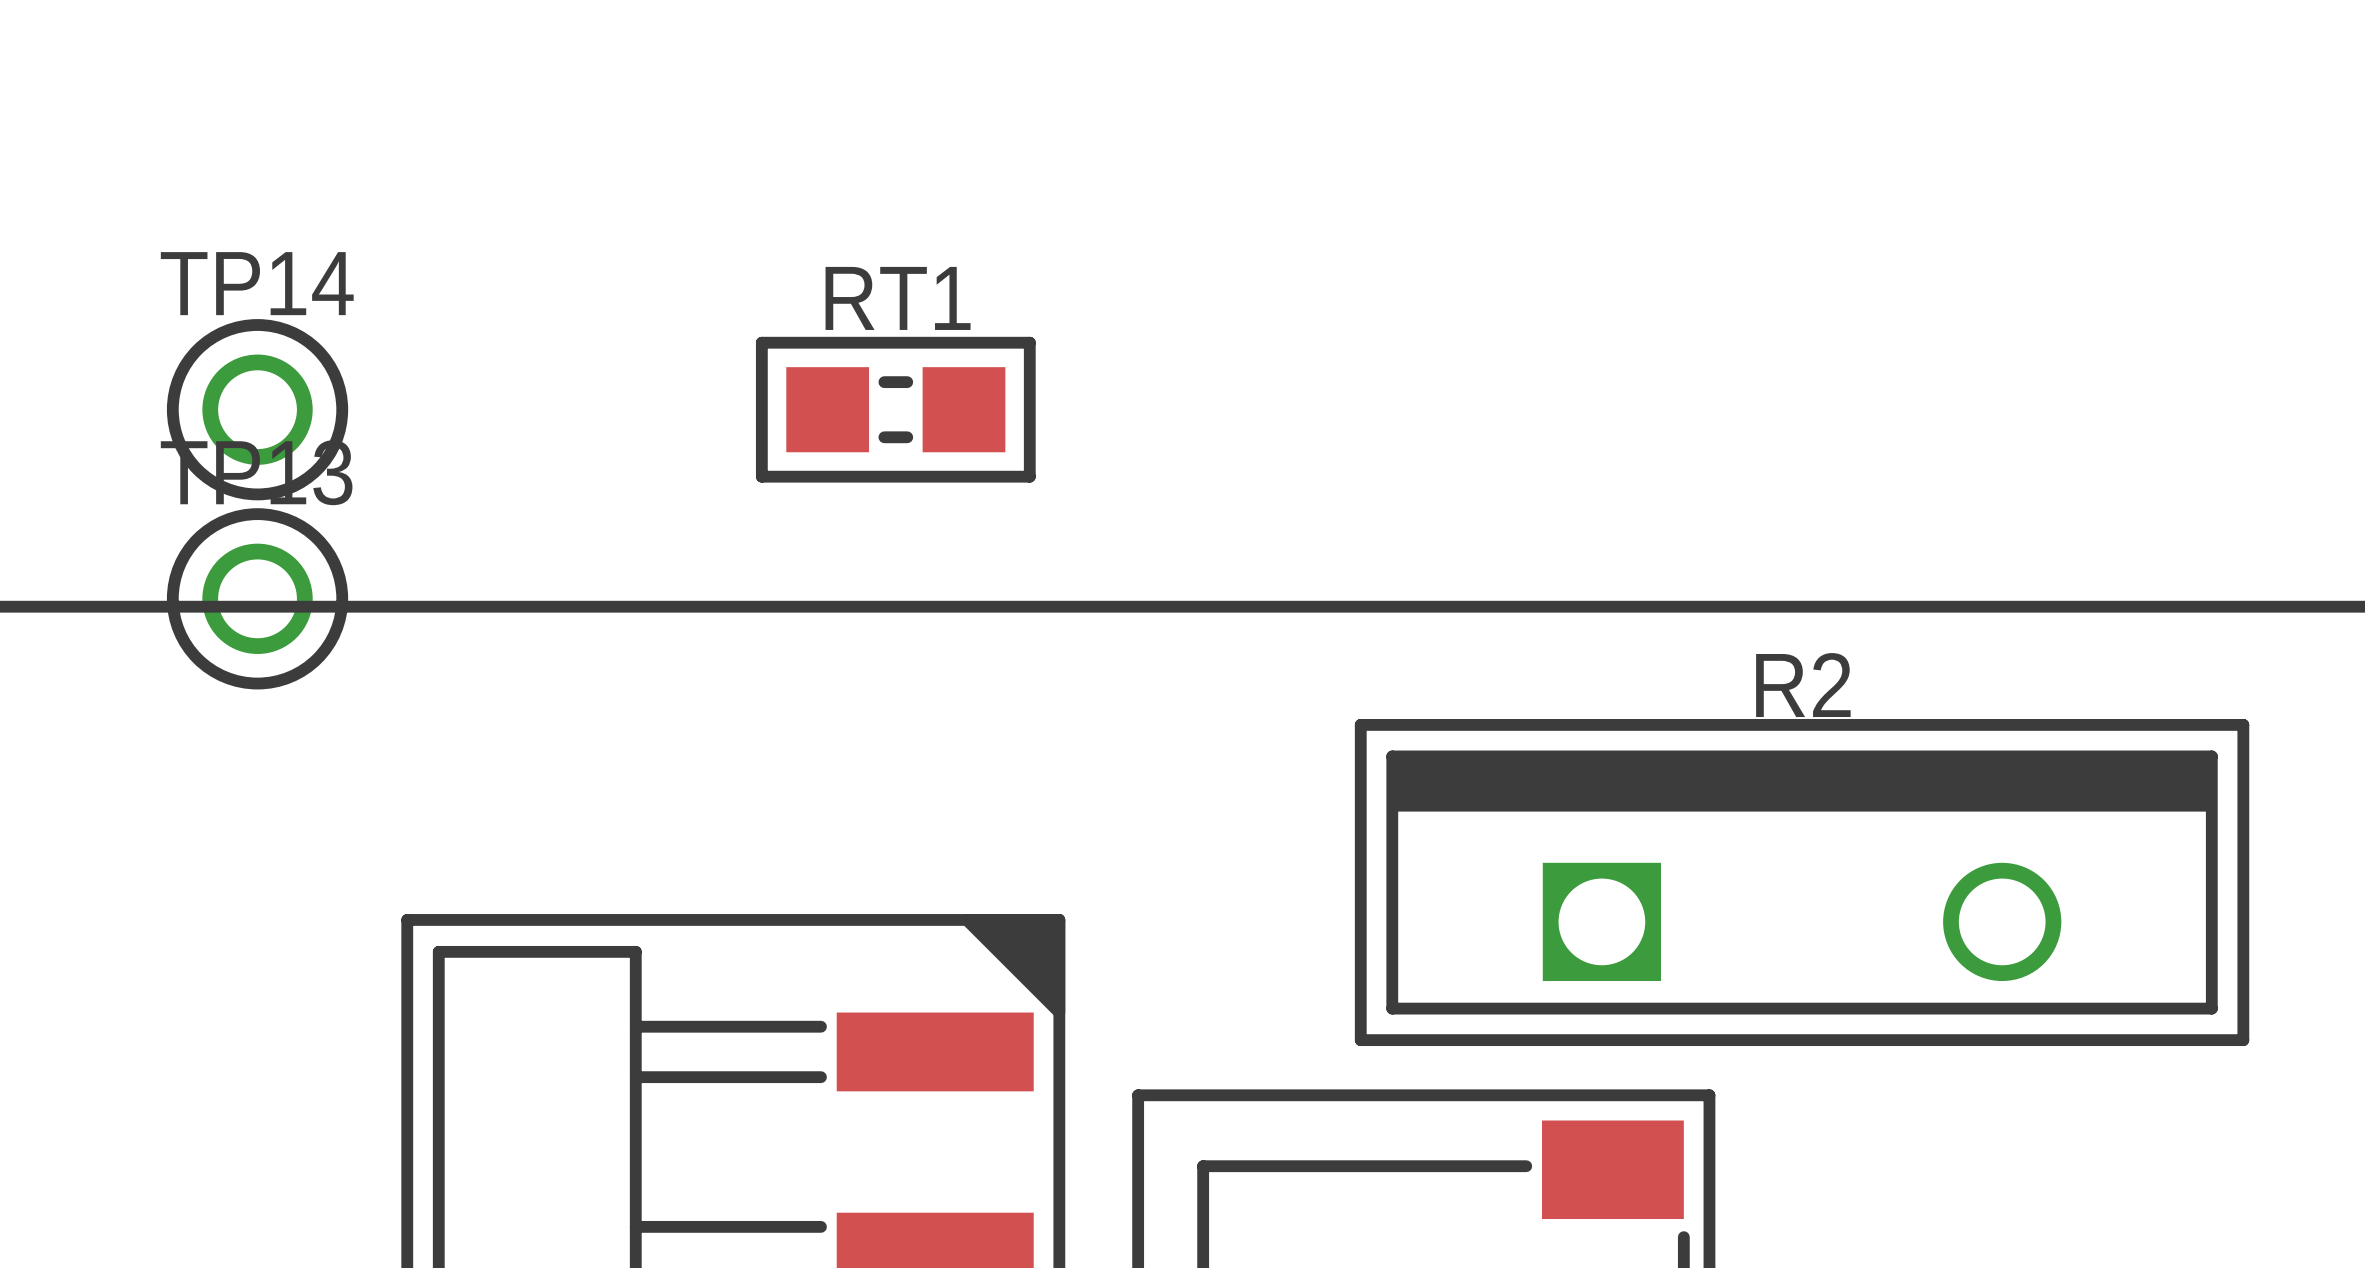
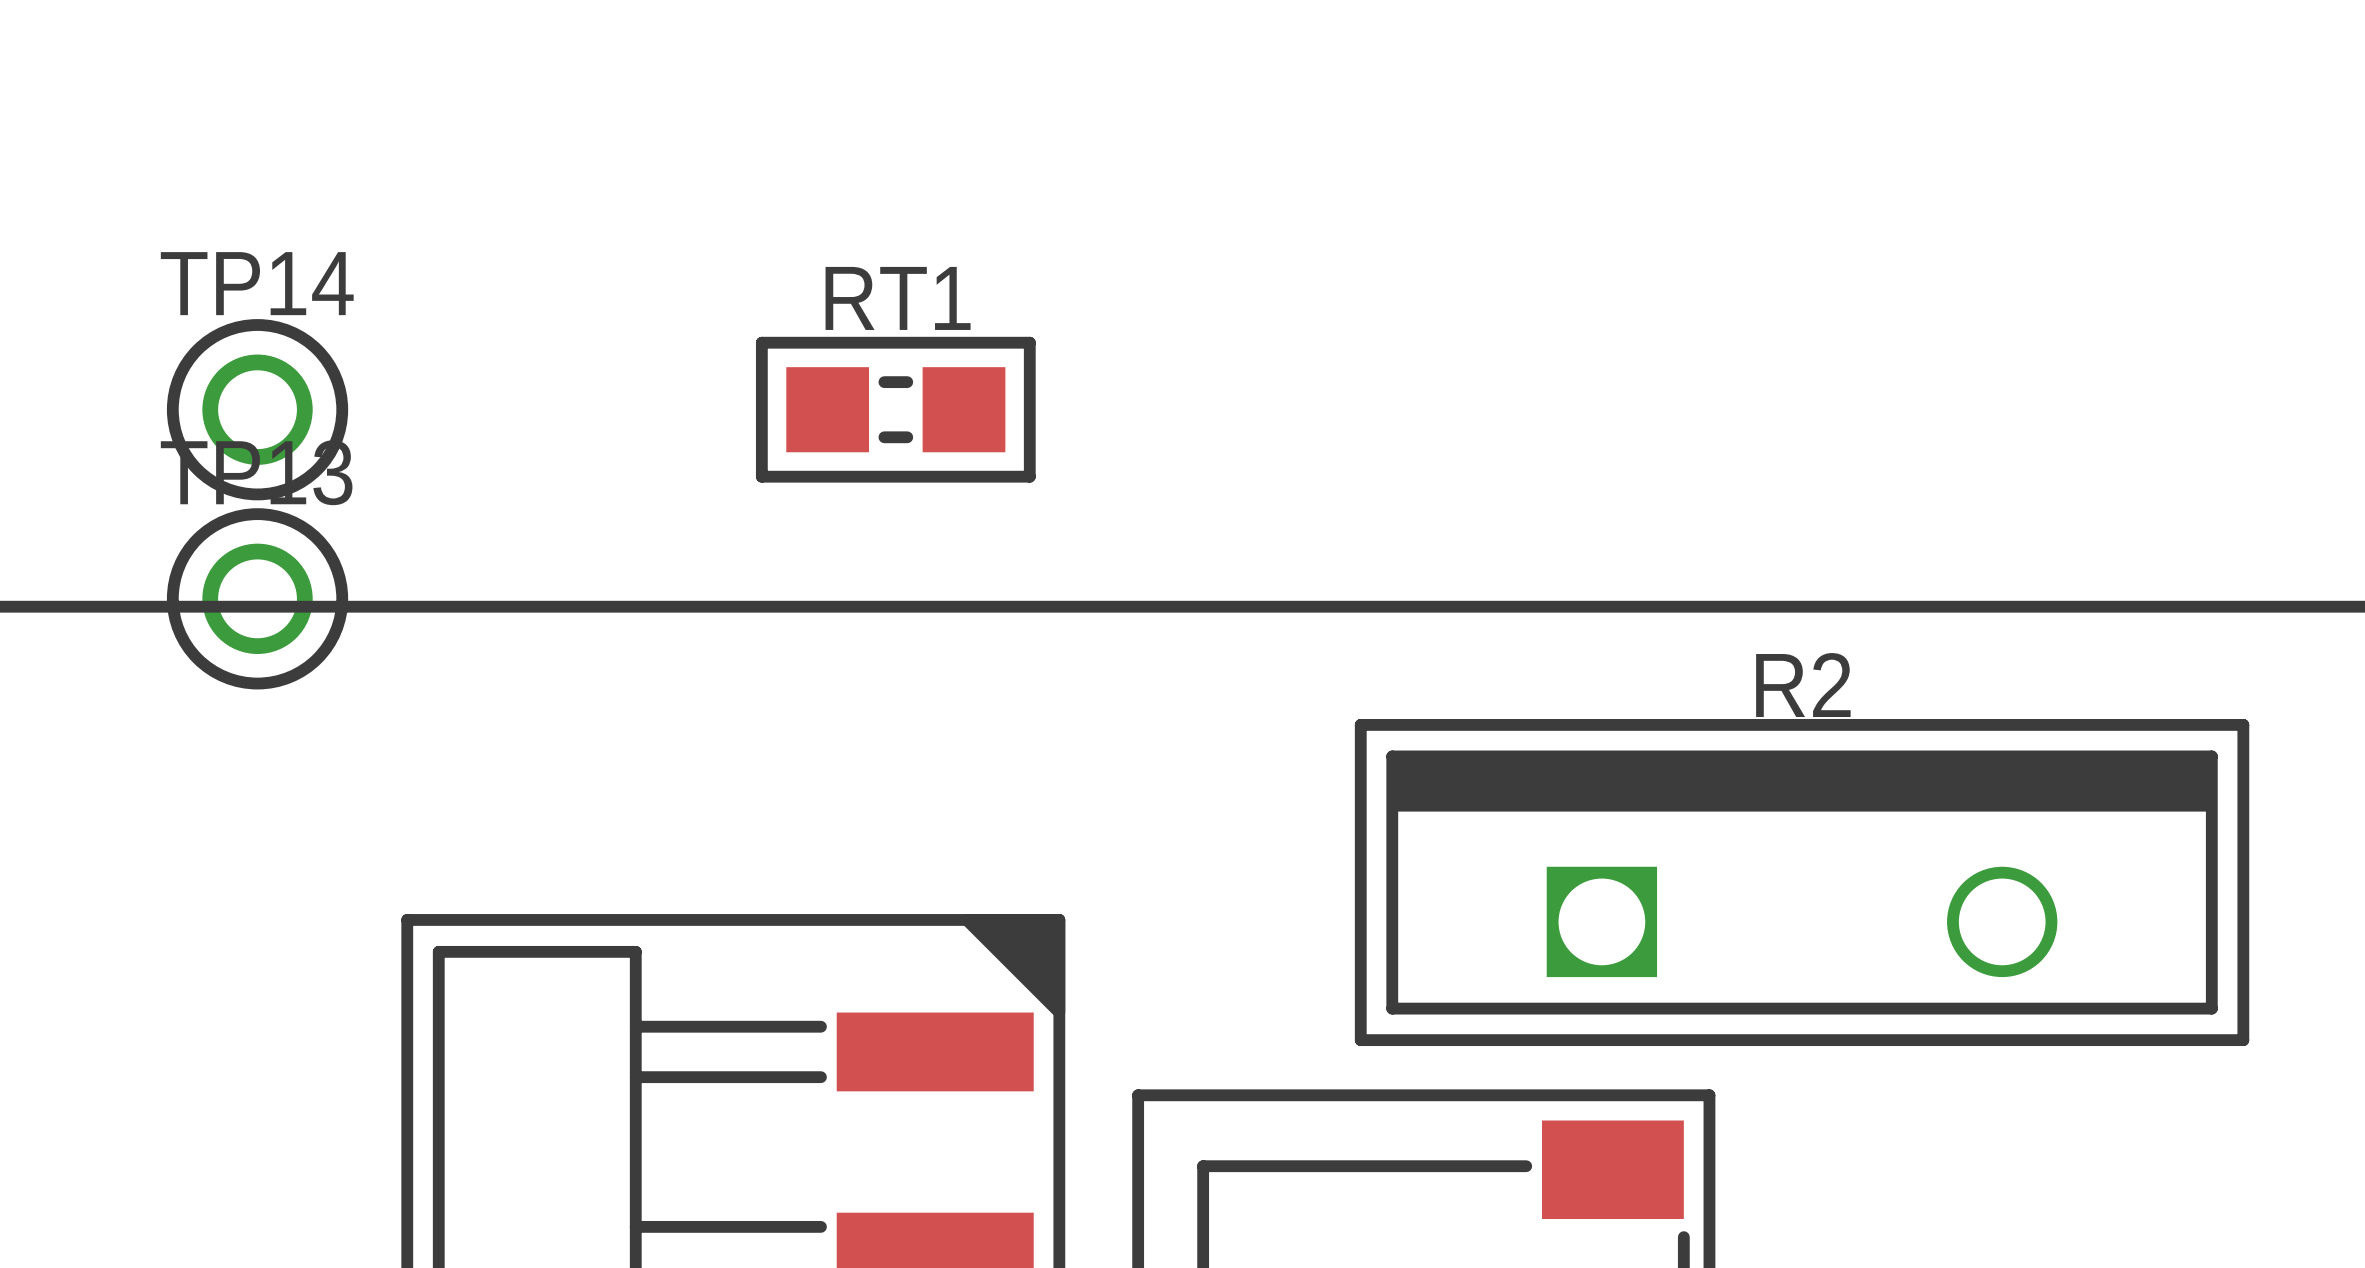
R2 footprint: [1354, 719, 2250, 1047] -> [1354, 719, 2250, 1047]

